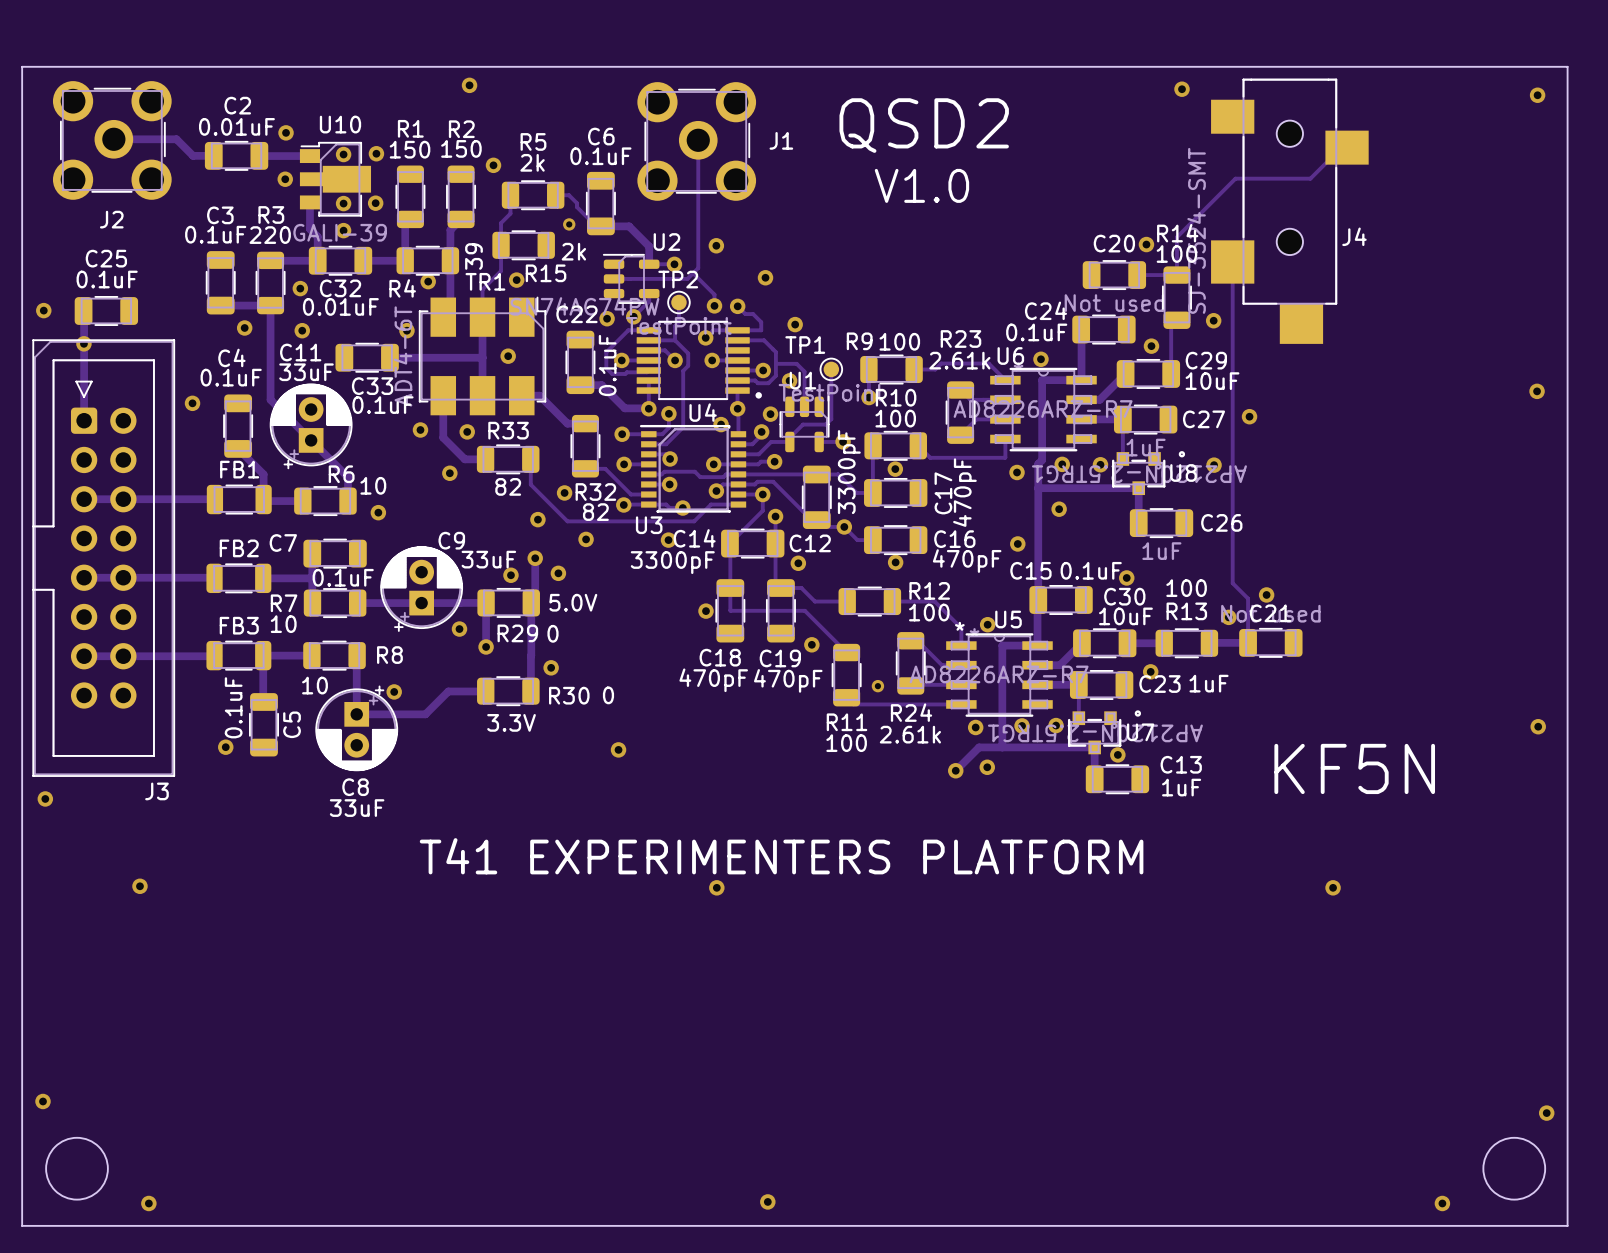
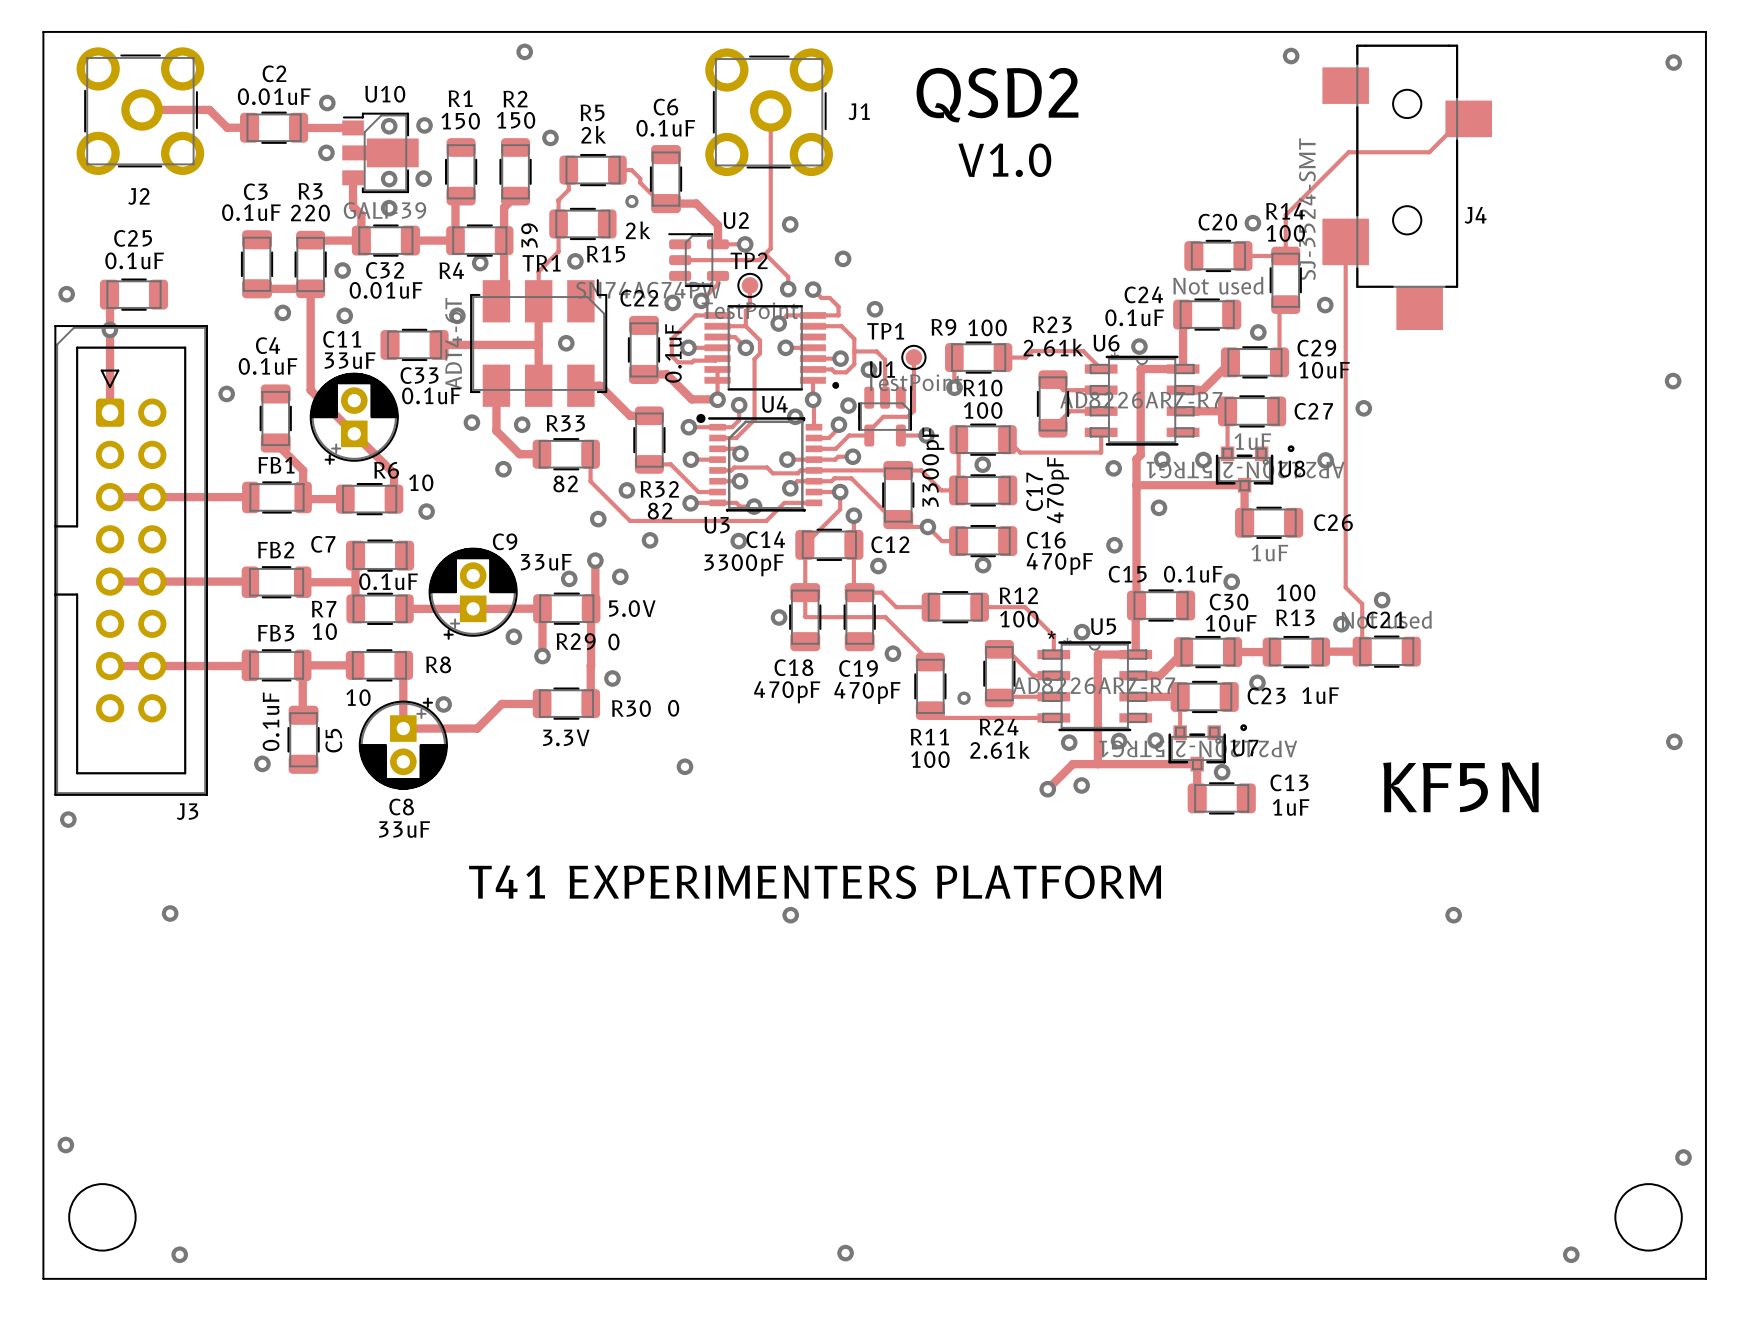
drawing: none -> [696, 413, 706, 424]

